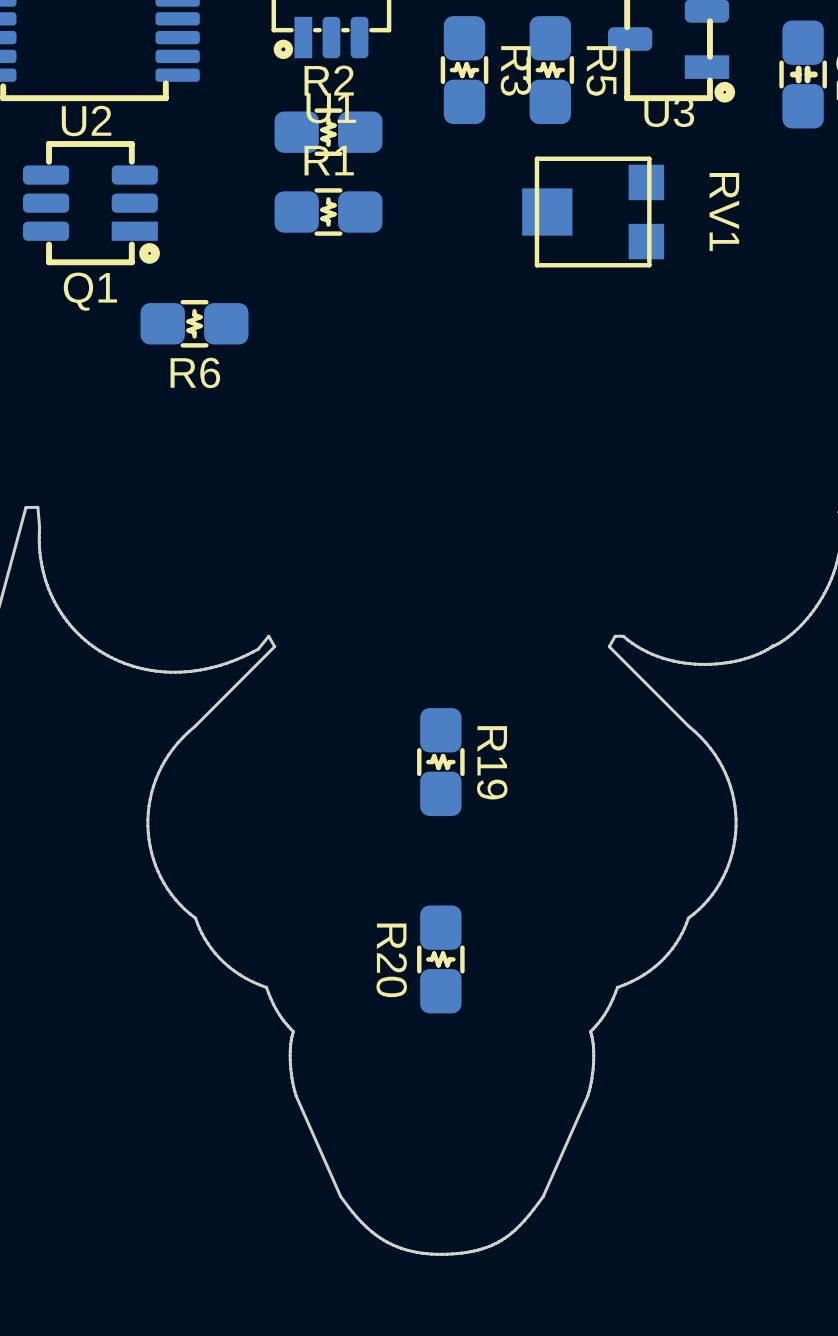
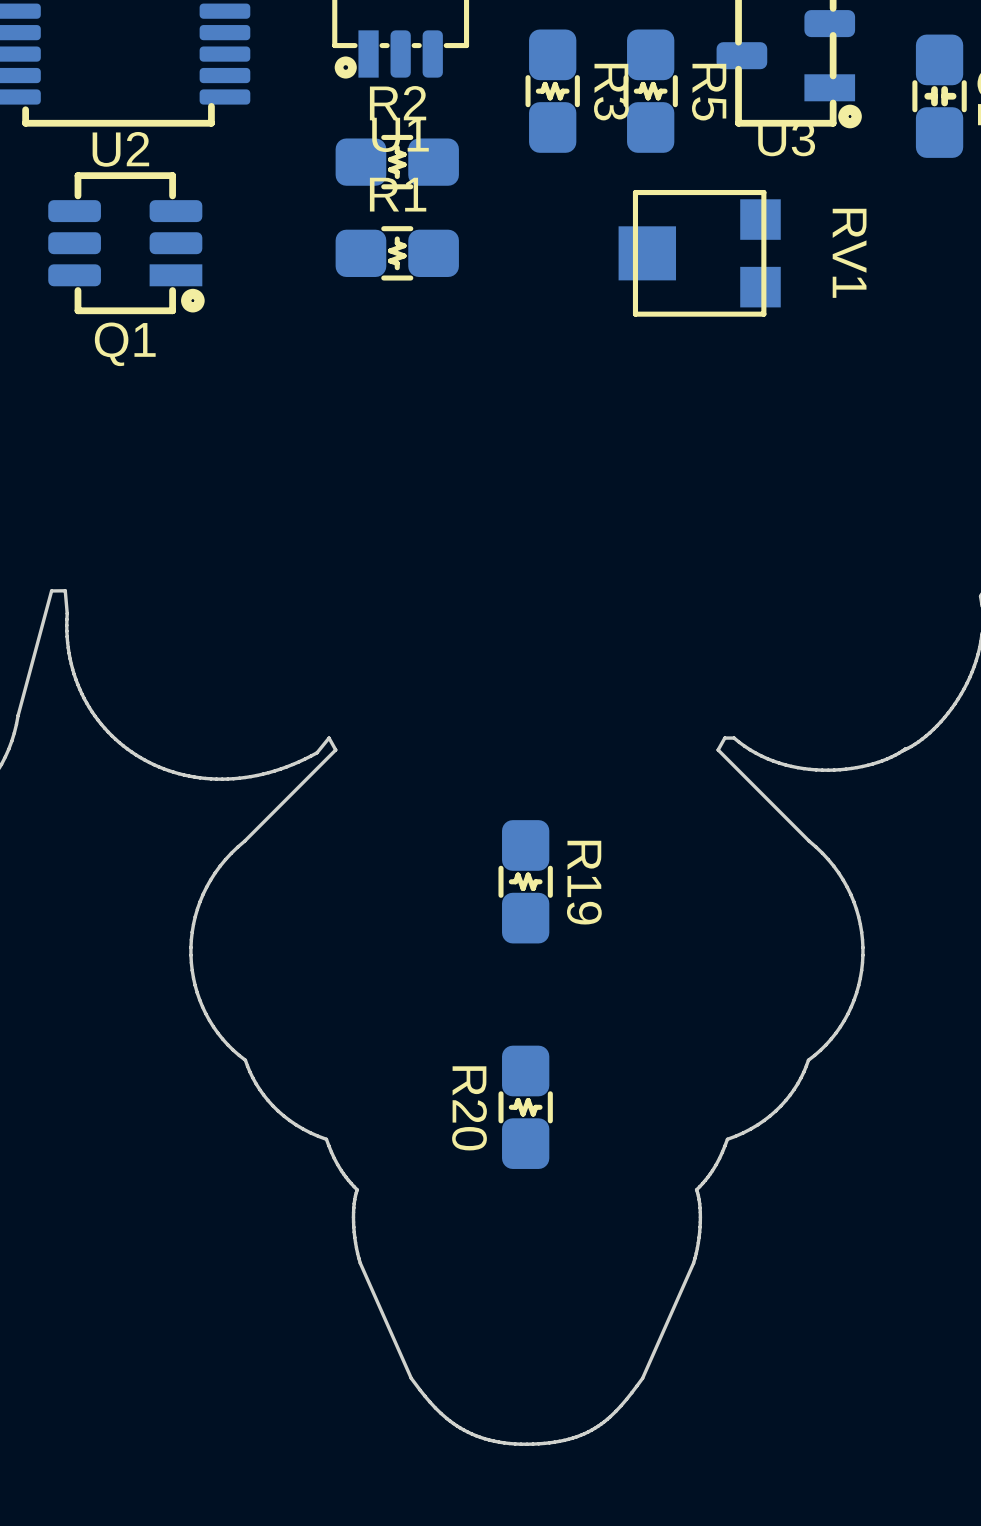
R6: (194, 323) -> none

